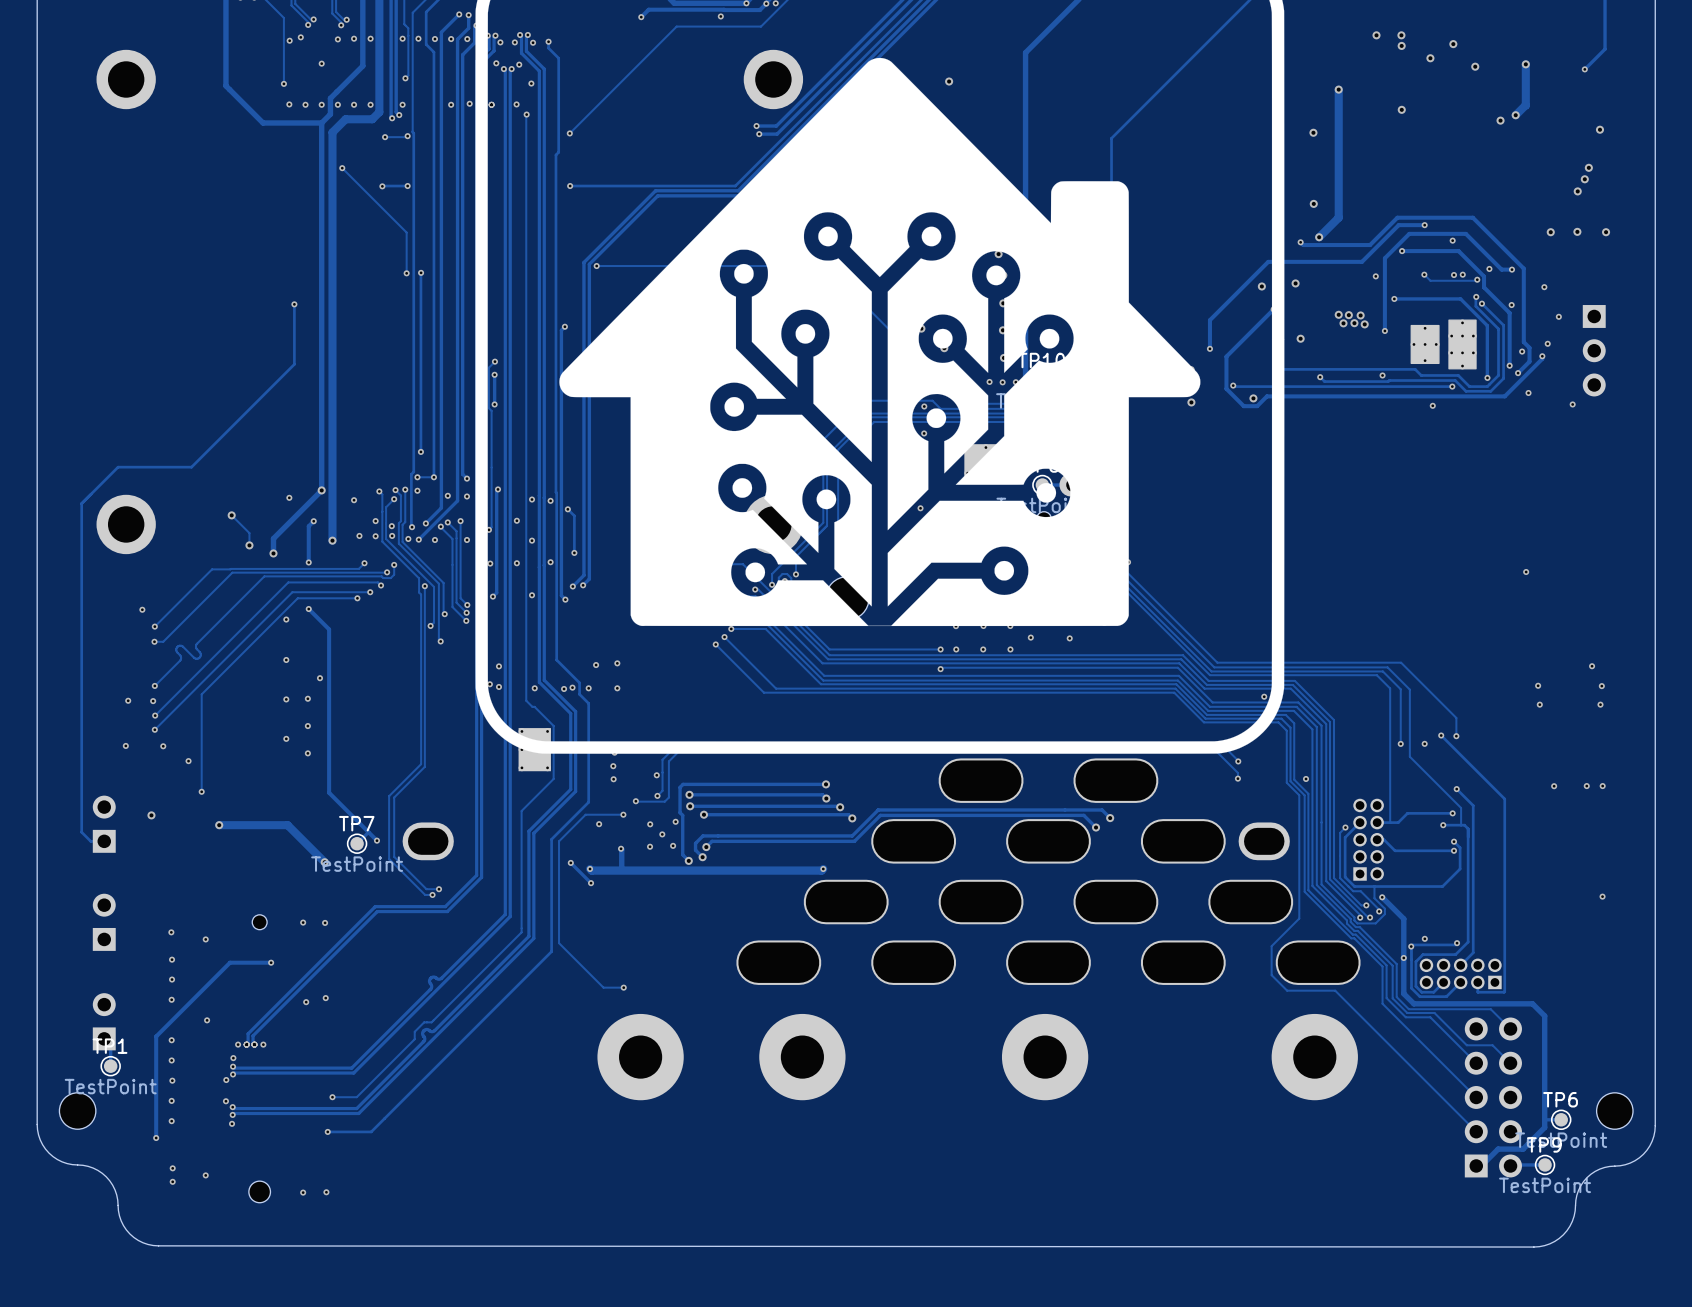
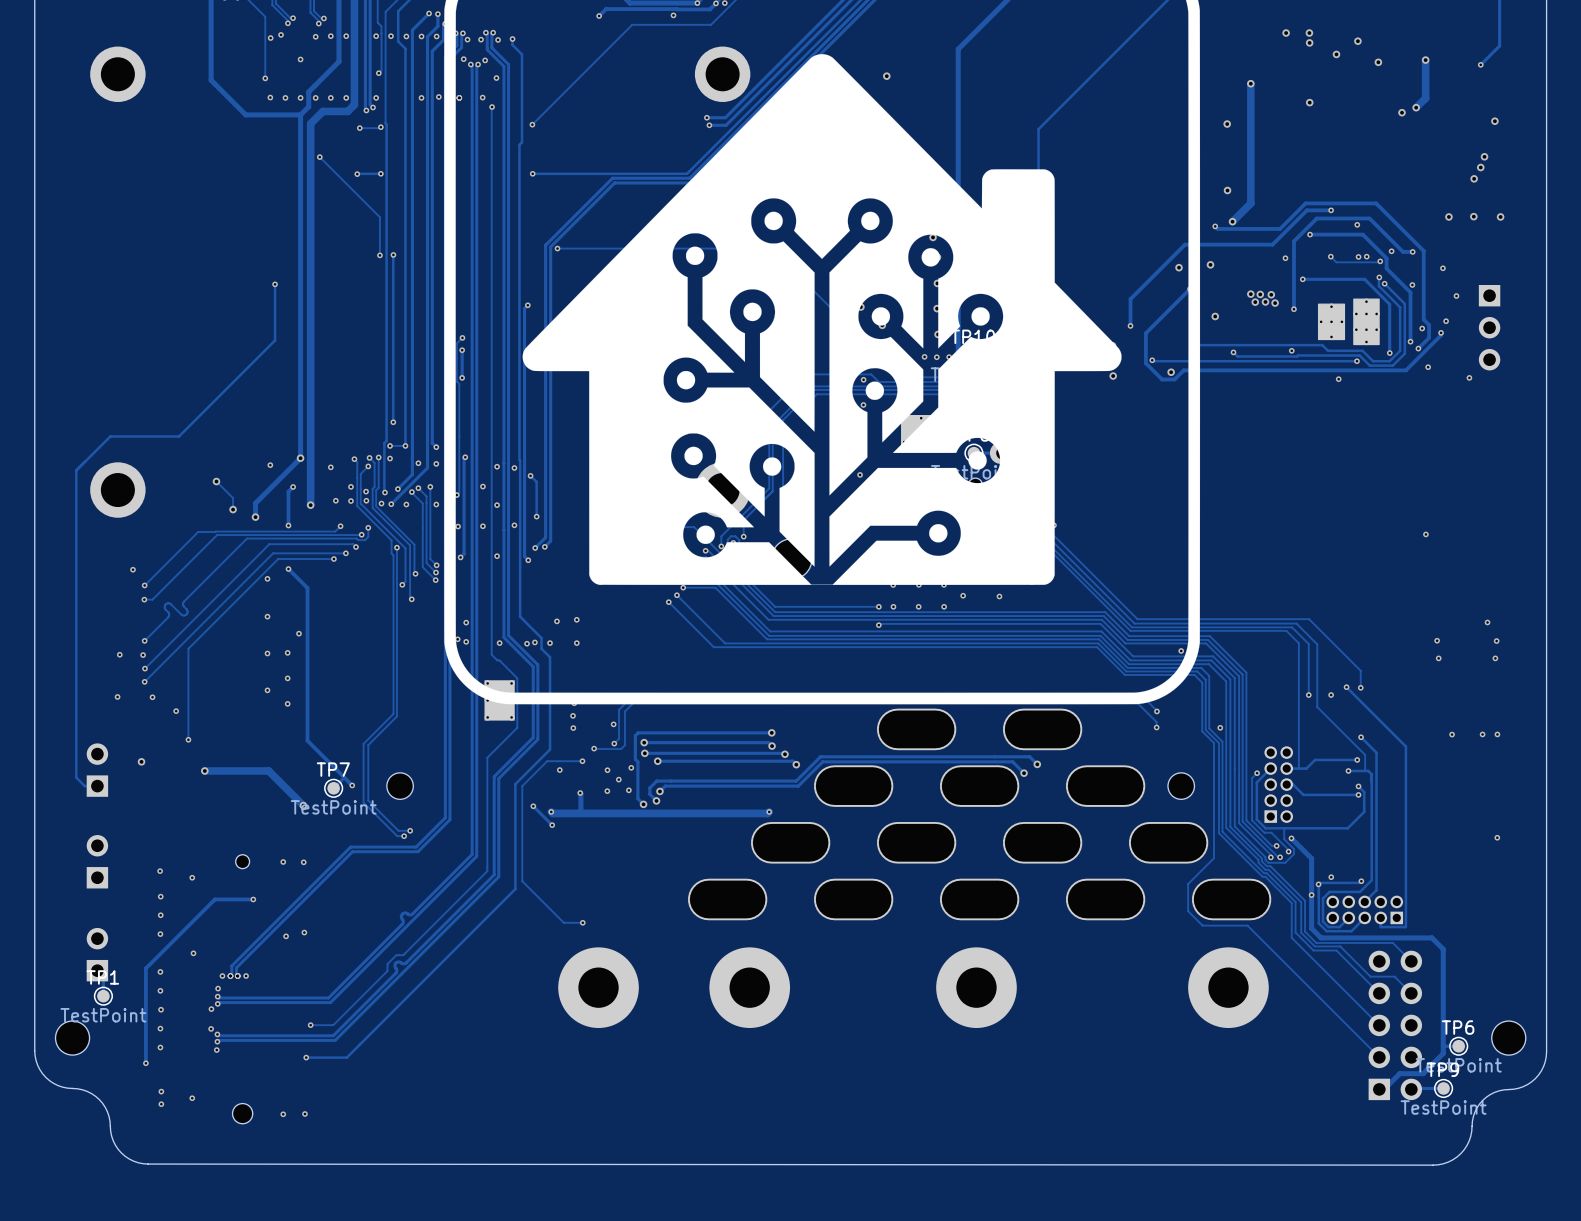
part footprint: [402, 822, 454, 861] -> [386, 772, 414, 800]
part footprint: [1238, 822, 1290, 861] -> [1167, 772, 1195, 800]

